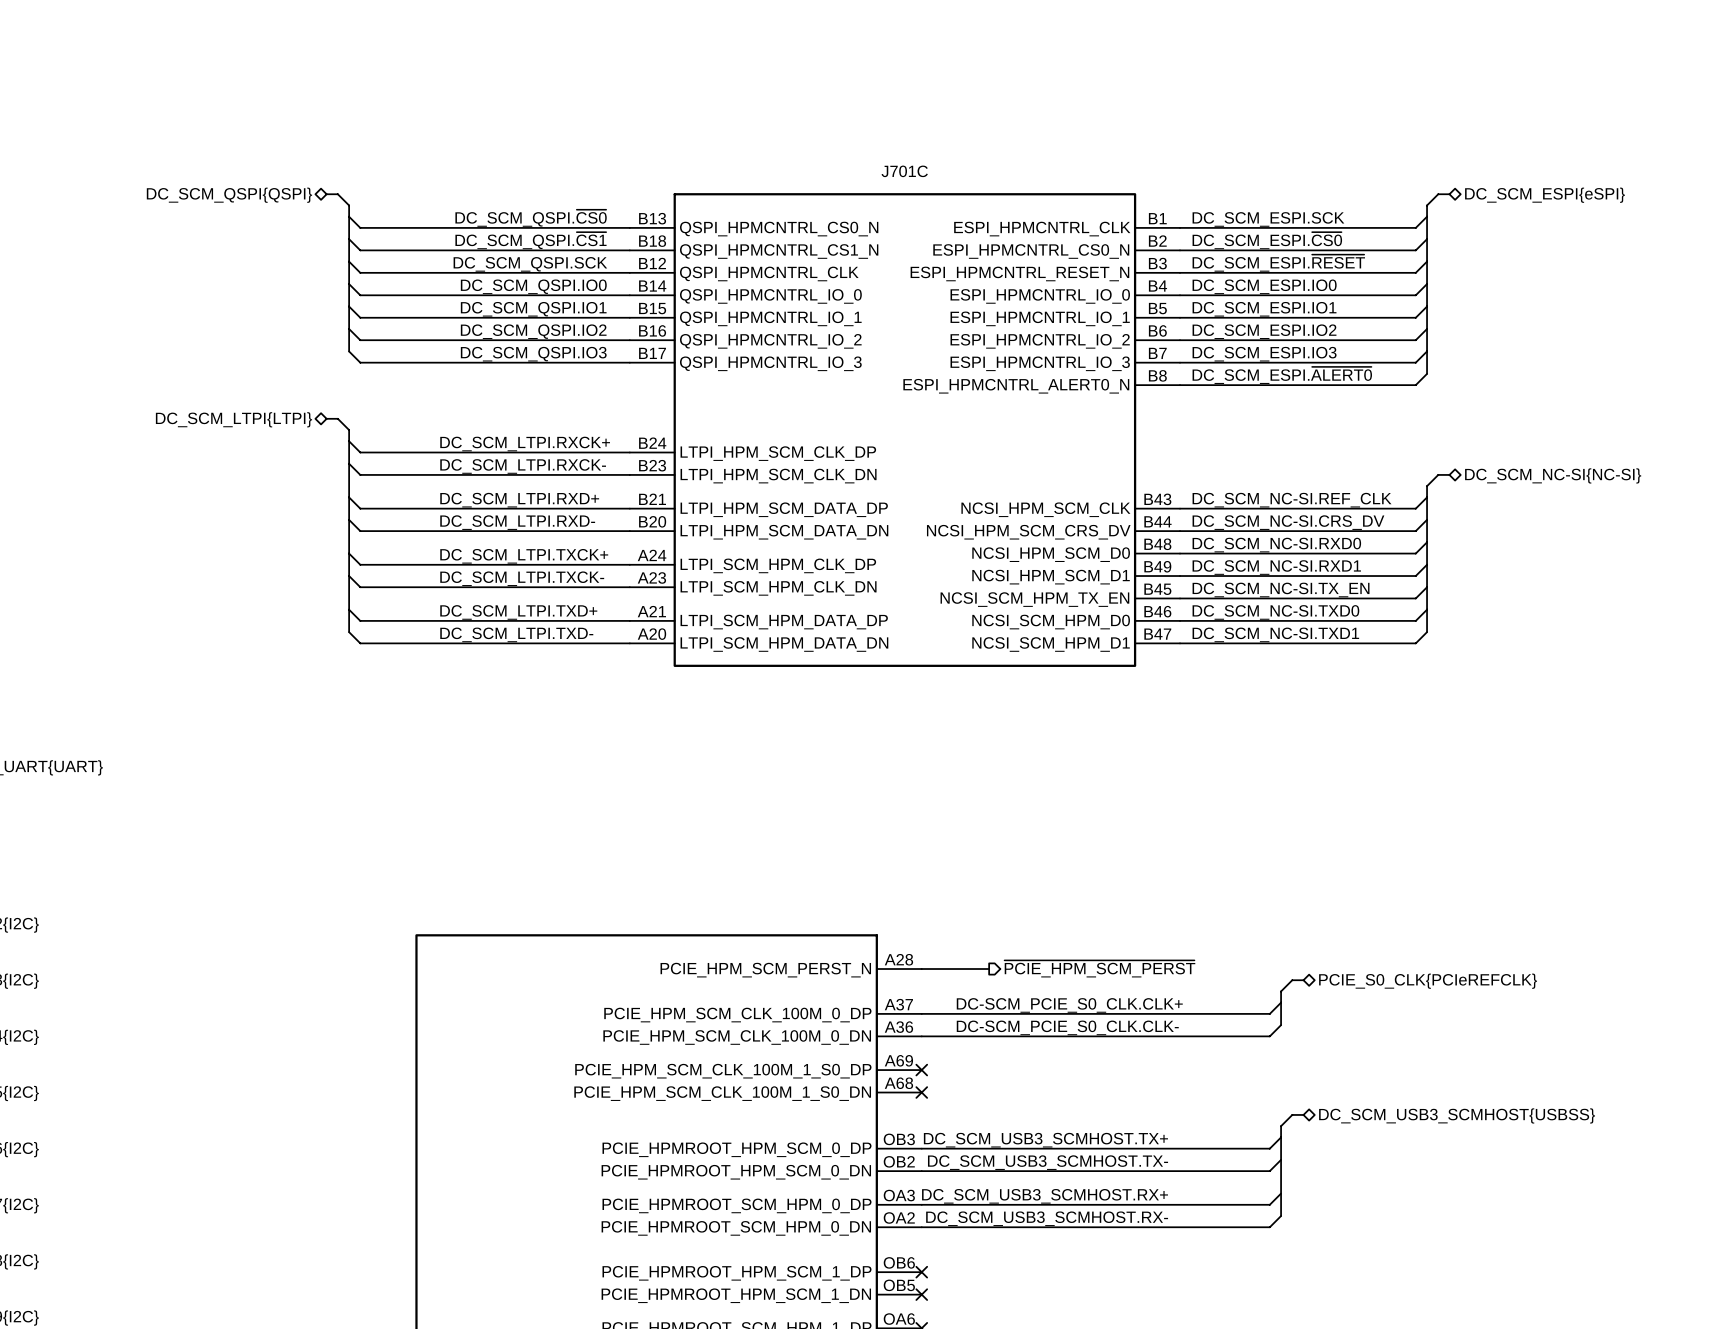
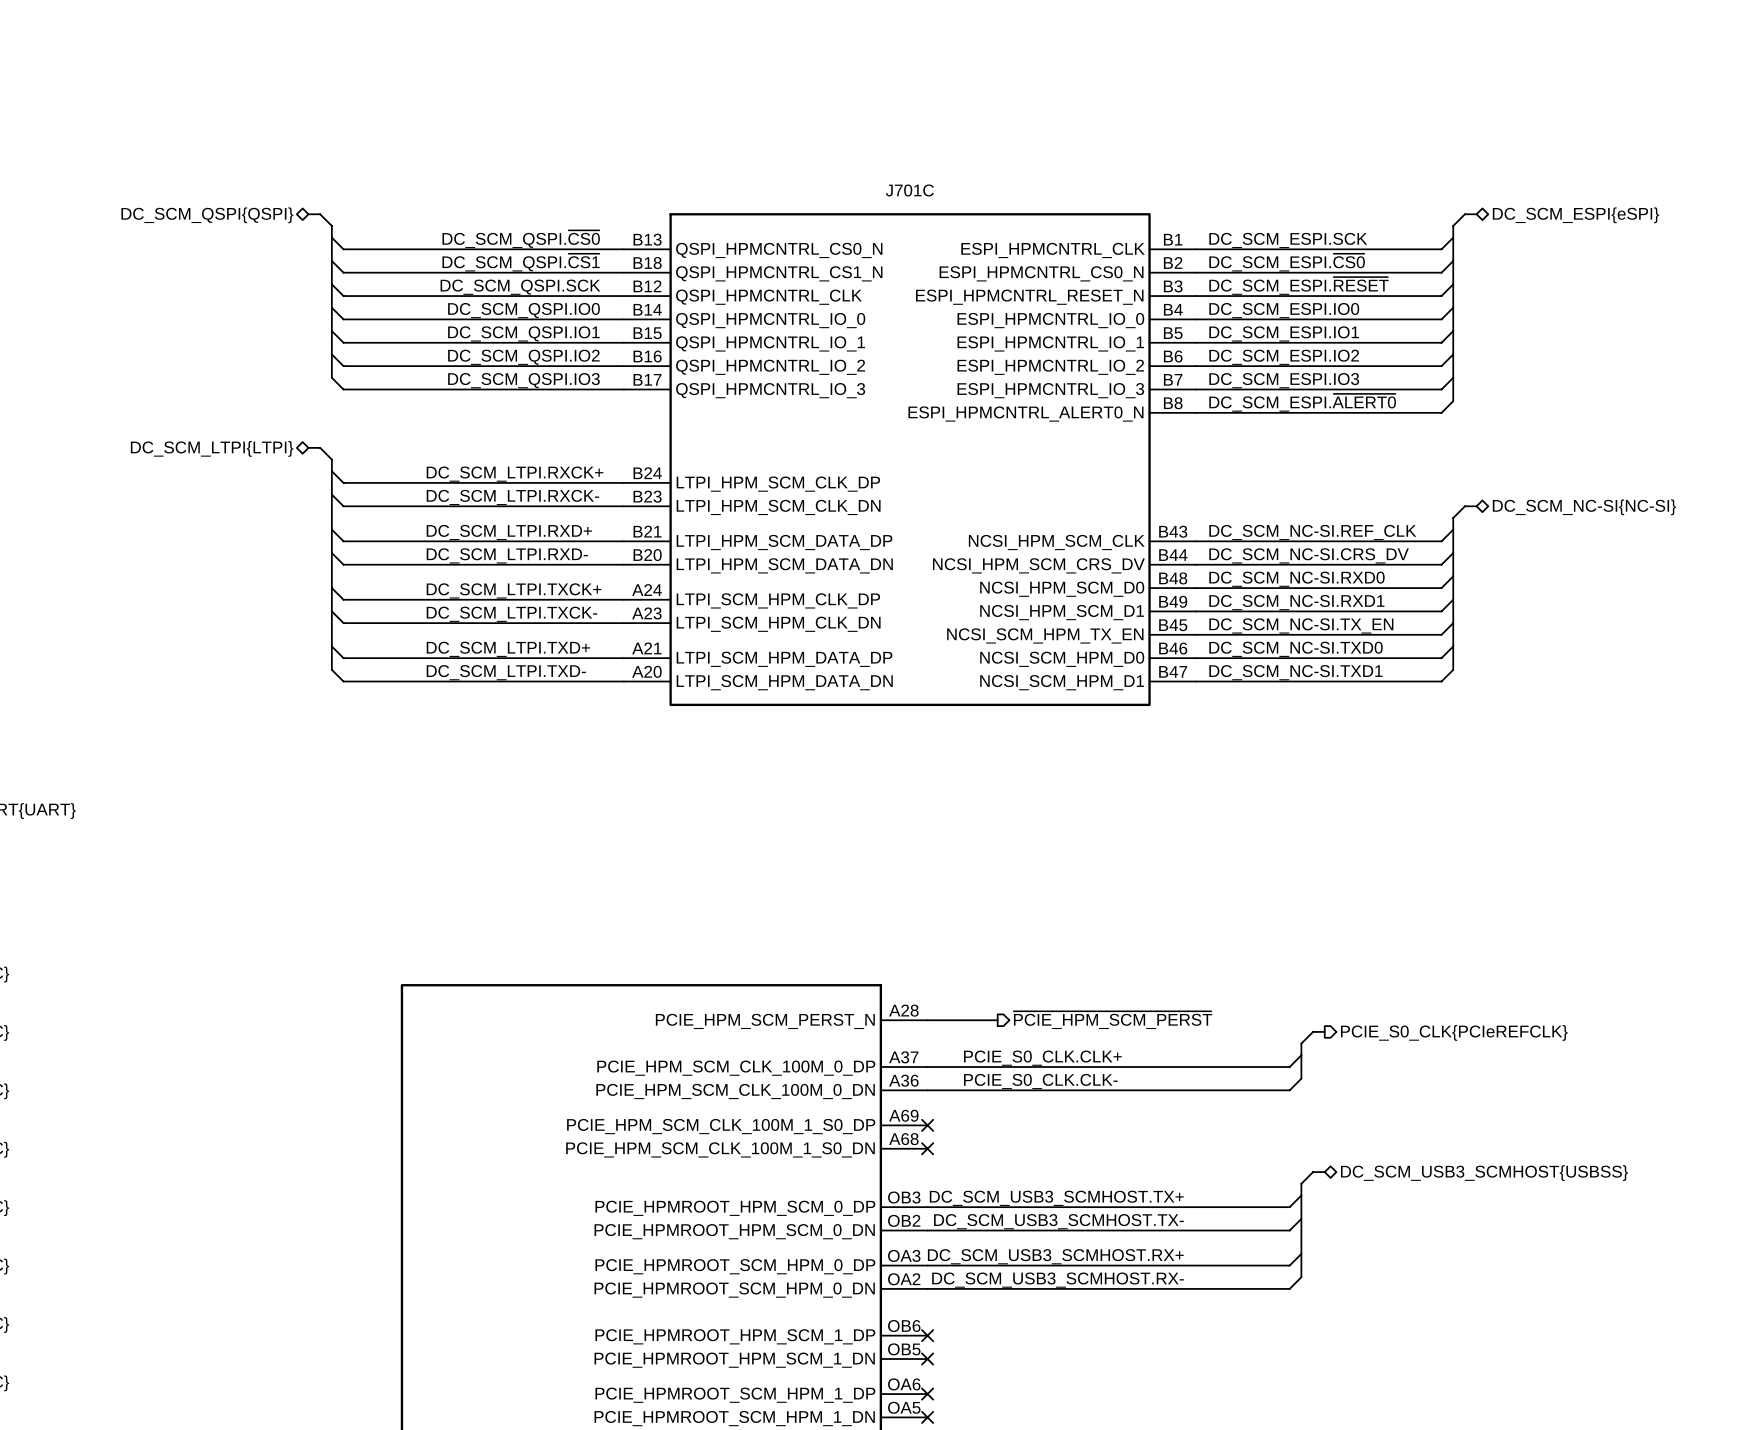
hierarchical label shape: bidirectional (1428, 981) -> output (1454, 1032)
label: DC-SCM_PCIE_S0_CLK.CLK+ (1069, 1005) -> PCIE_S0_CLK.CLK+ (1042, 1058)
label: DC-SCM_PCIE_S0_CLK.CLK- (1067, 1027) -> PCIE_S0_CLK.CLK- (1040, 1081)

